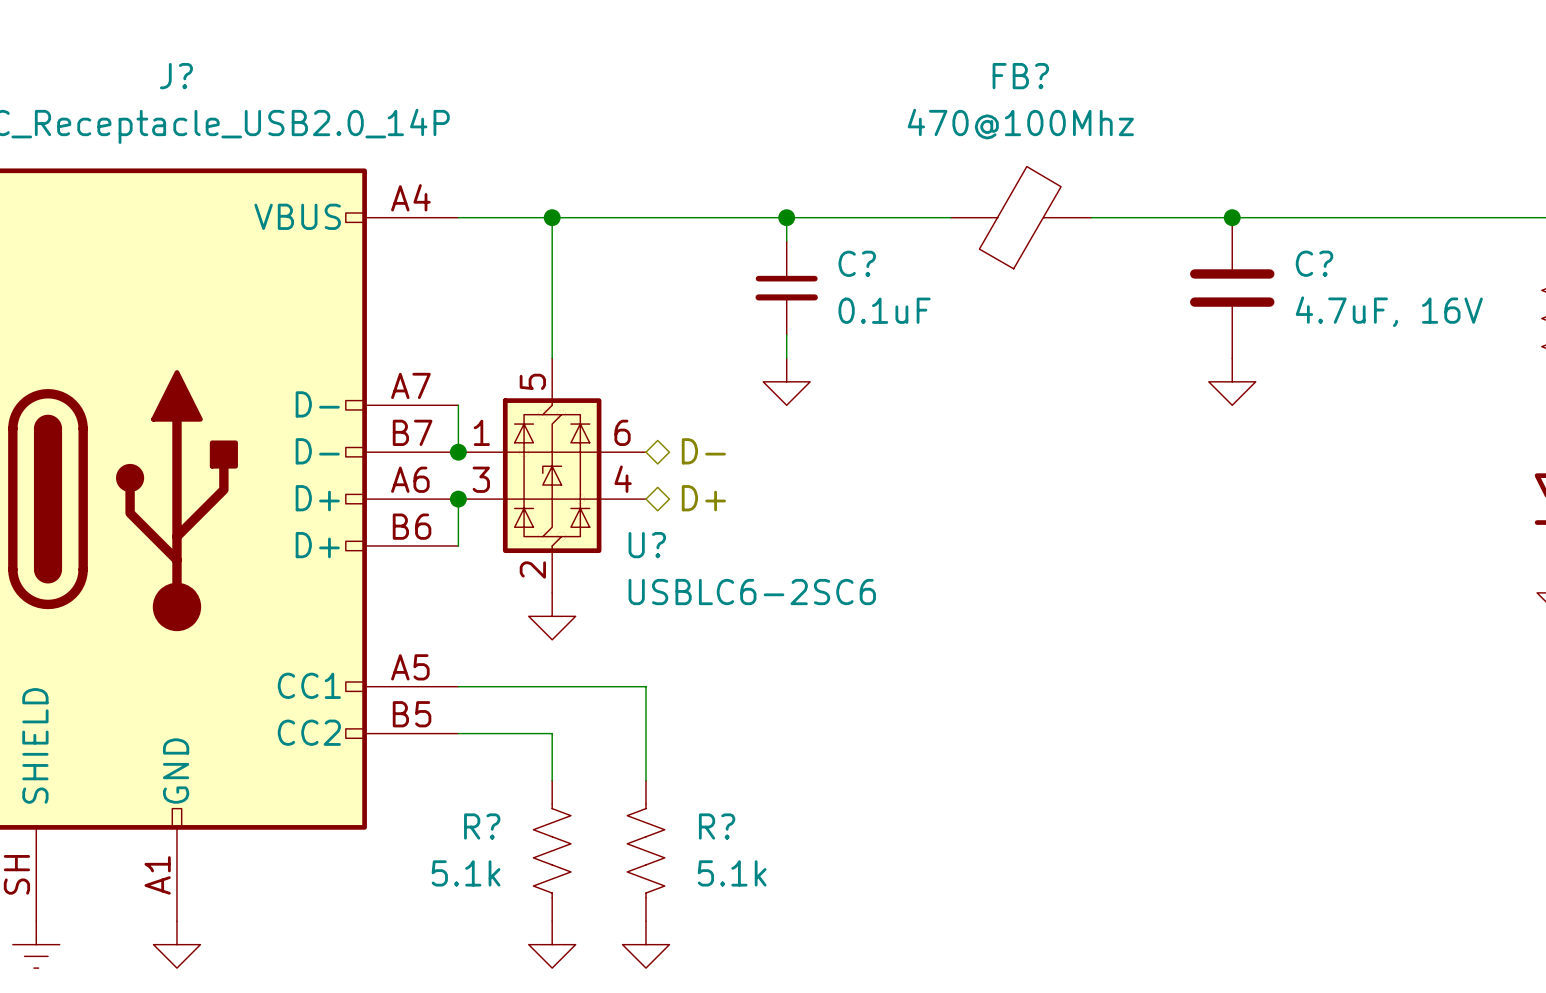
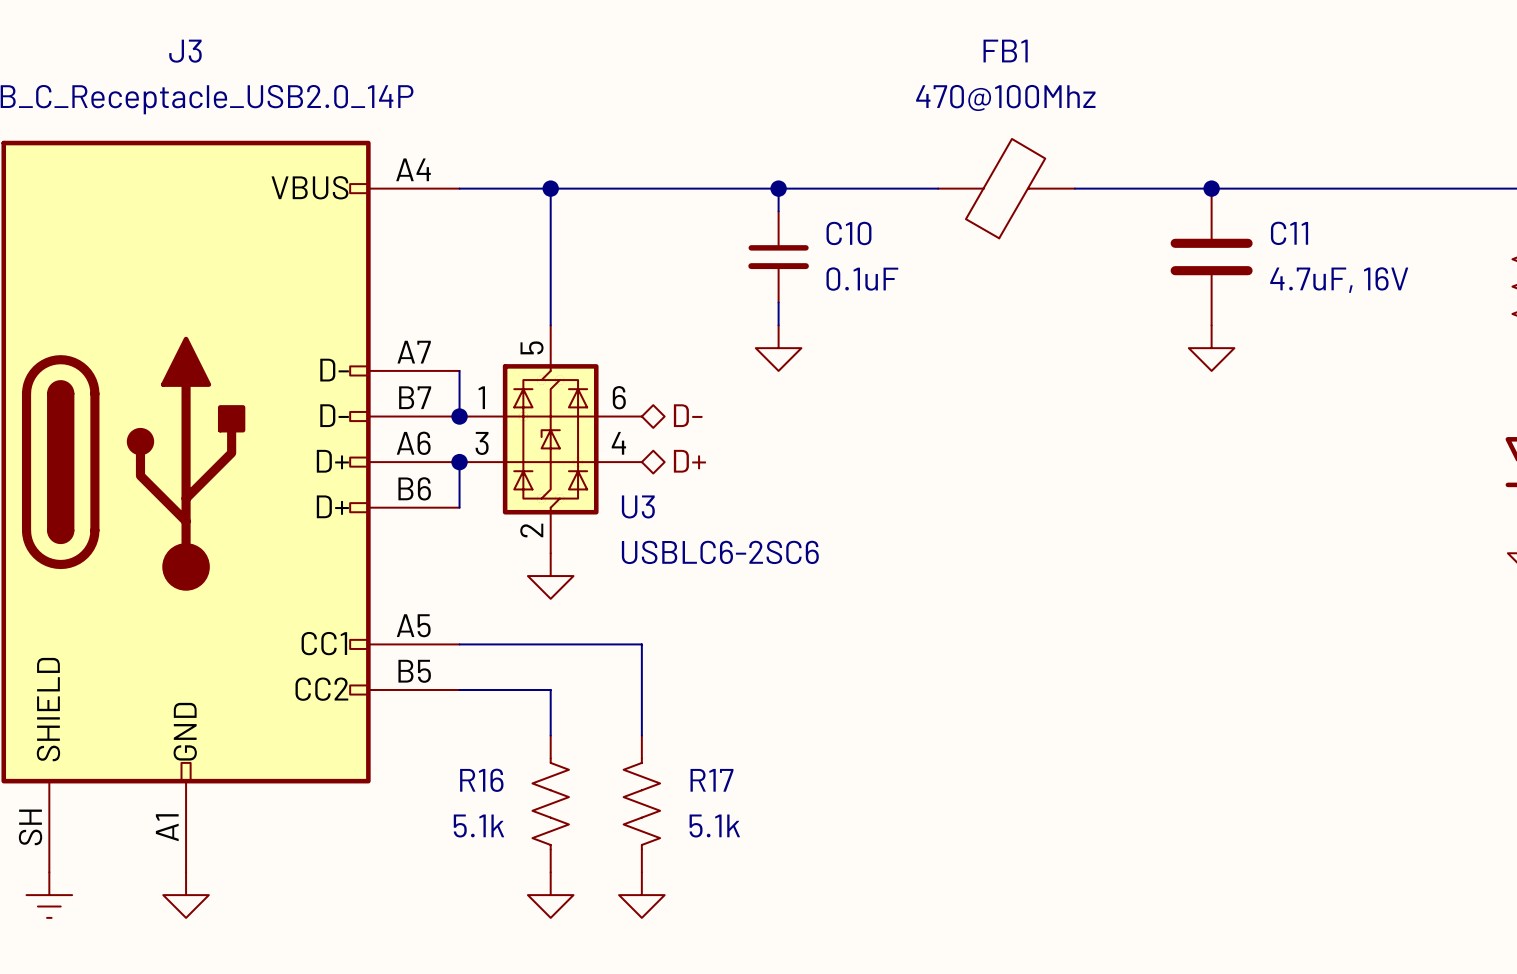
J? name: J? (176, 76) -> J3 (185, 51)
FB? name: FB? (1020, 76) -> FB1 (1005, 51)
C? name: C? (857, 263) -> C10 (848, 233)
C? name: C? (1314, 263) -> C11 (1289, 233)
U? name: U? (647, 545) -> U3 (638, 506)
R? name: R? (482, 826) -> R16 (481, 780)
R? name: R? (717, 826) -> R17 (711, 780)

